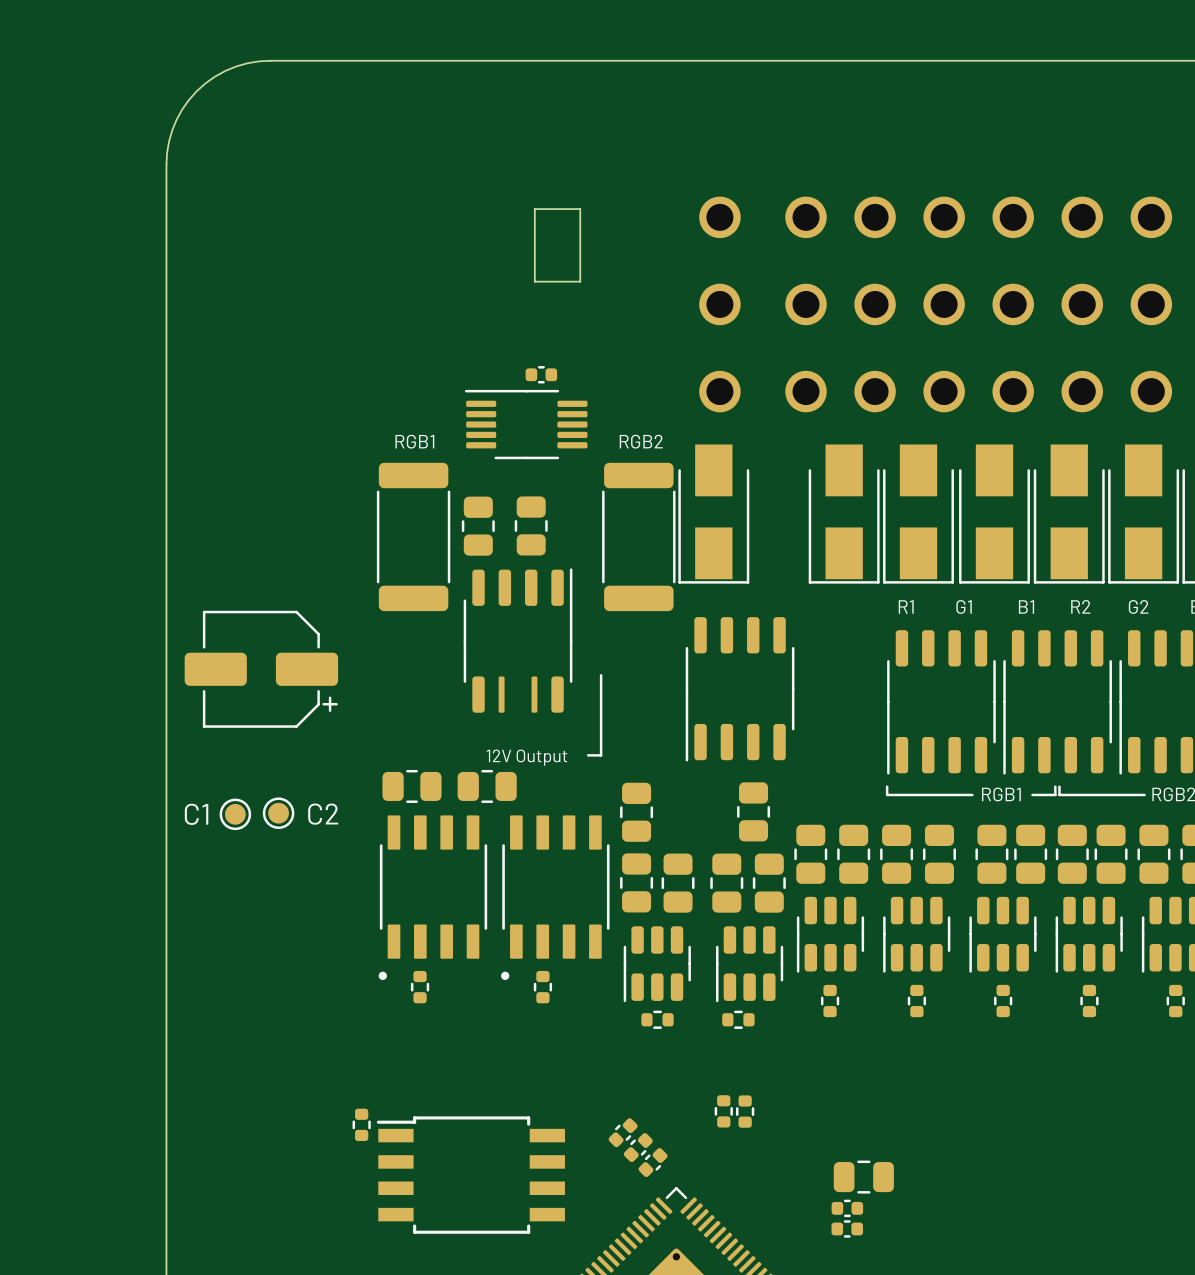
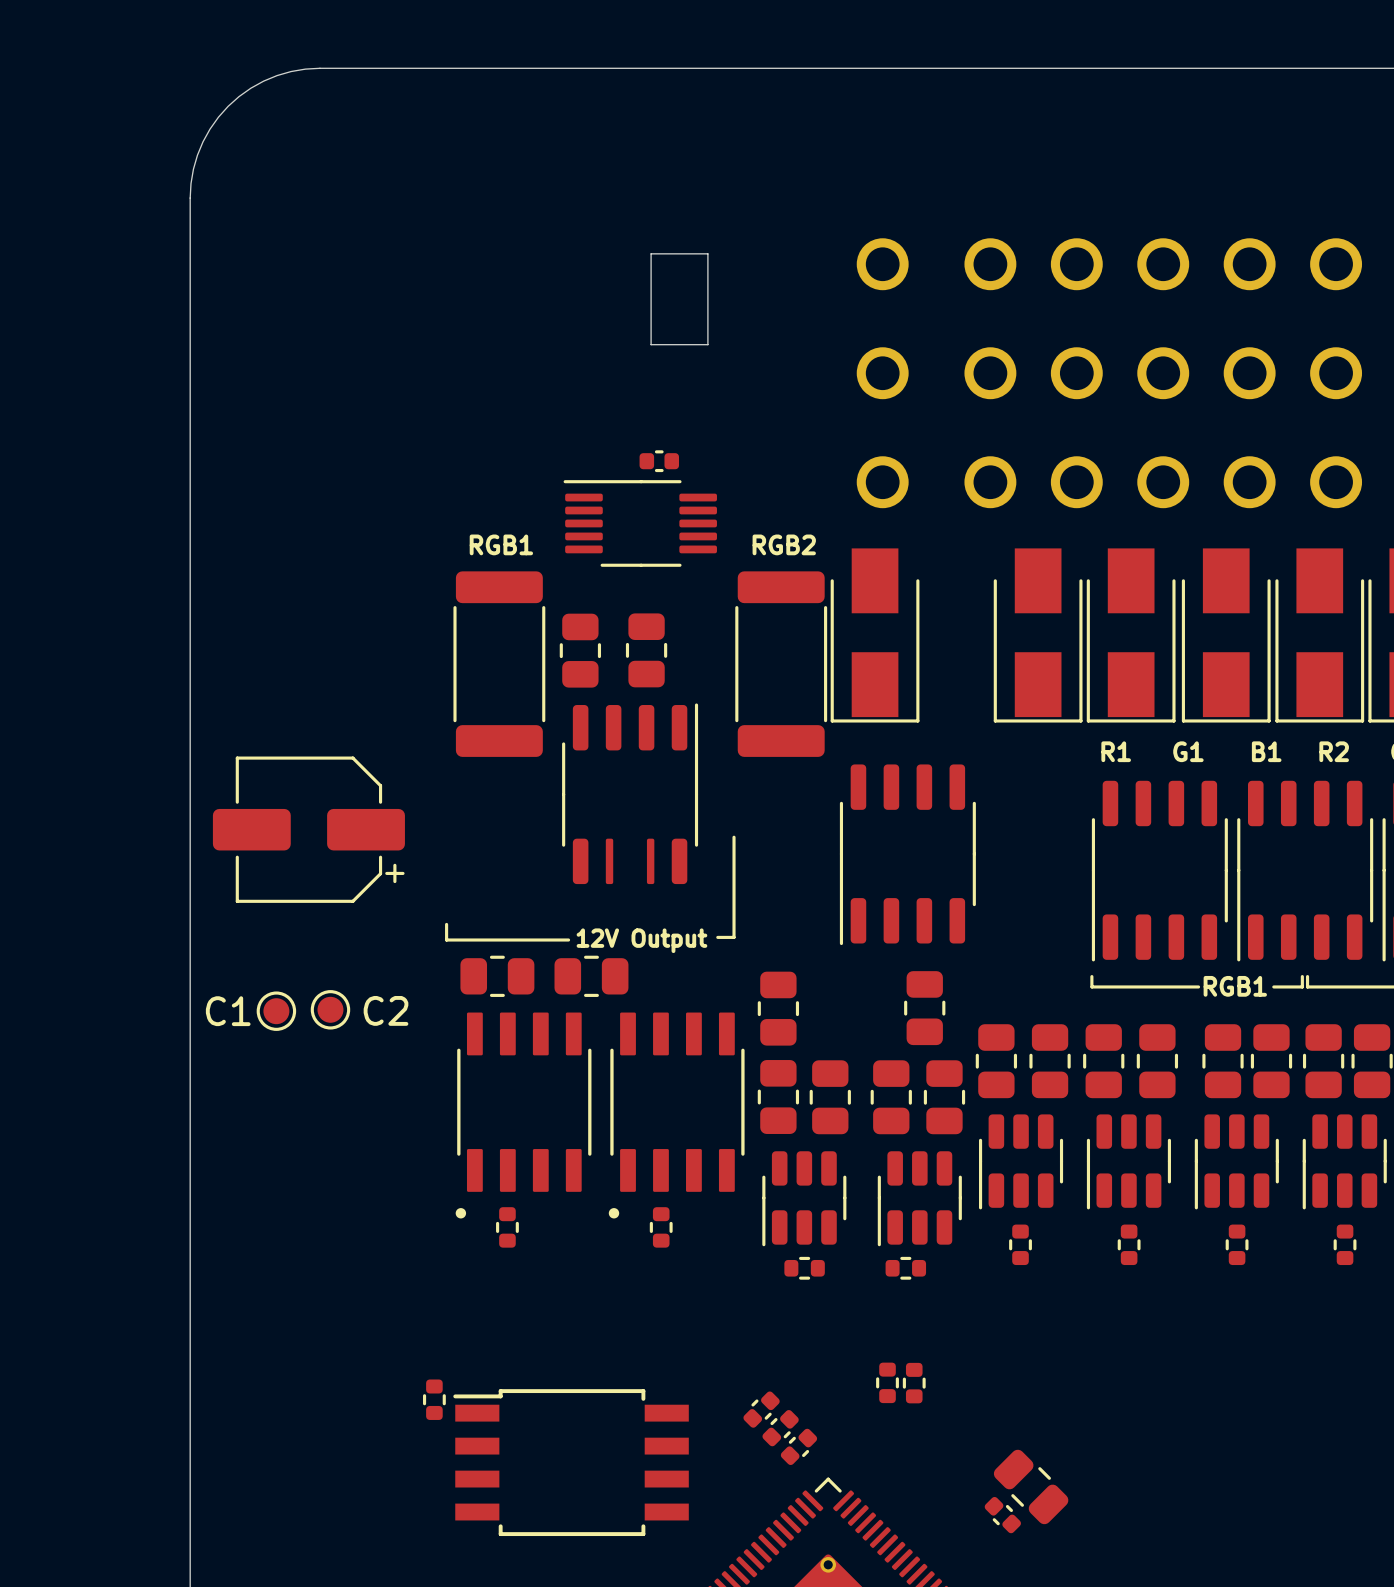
line: none -> (446, 924) (446, 940) (568, 940)
part: (863, 1177) -> none
part: none -> (1031, 1486)
part: (847, 1208) -> none
part: none -> (1002, 1515)
part: (847, 1228) -> none

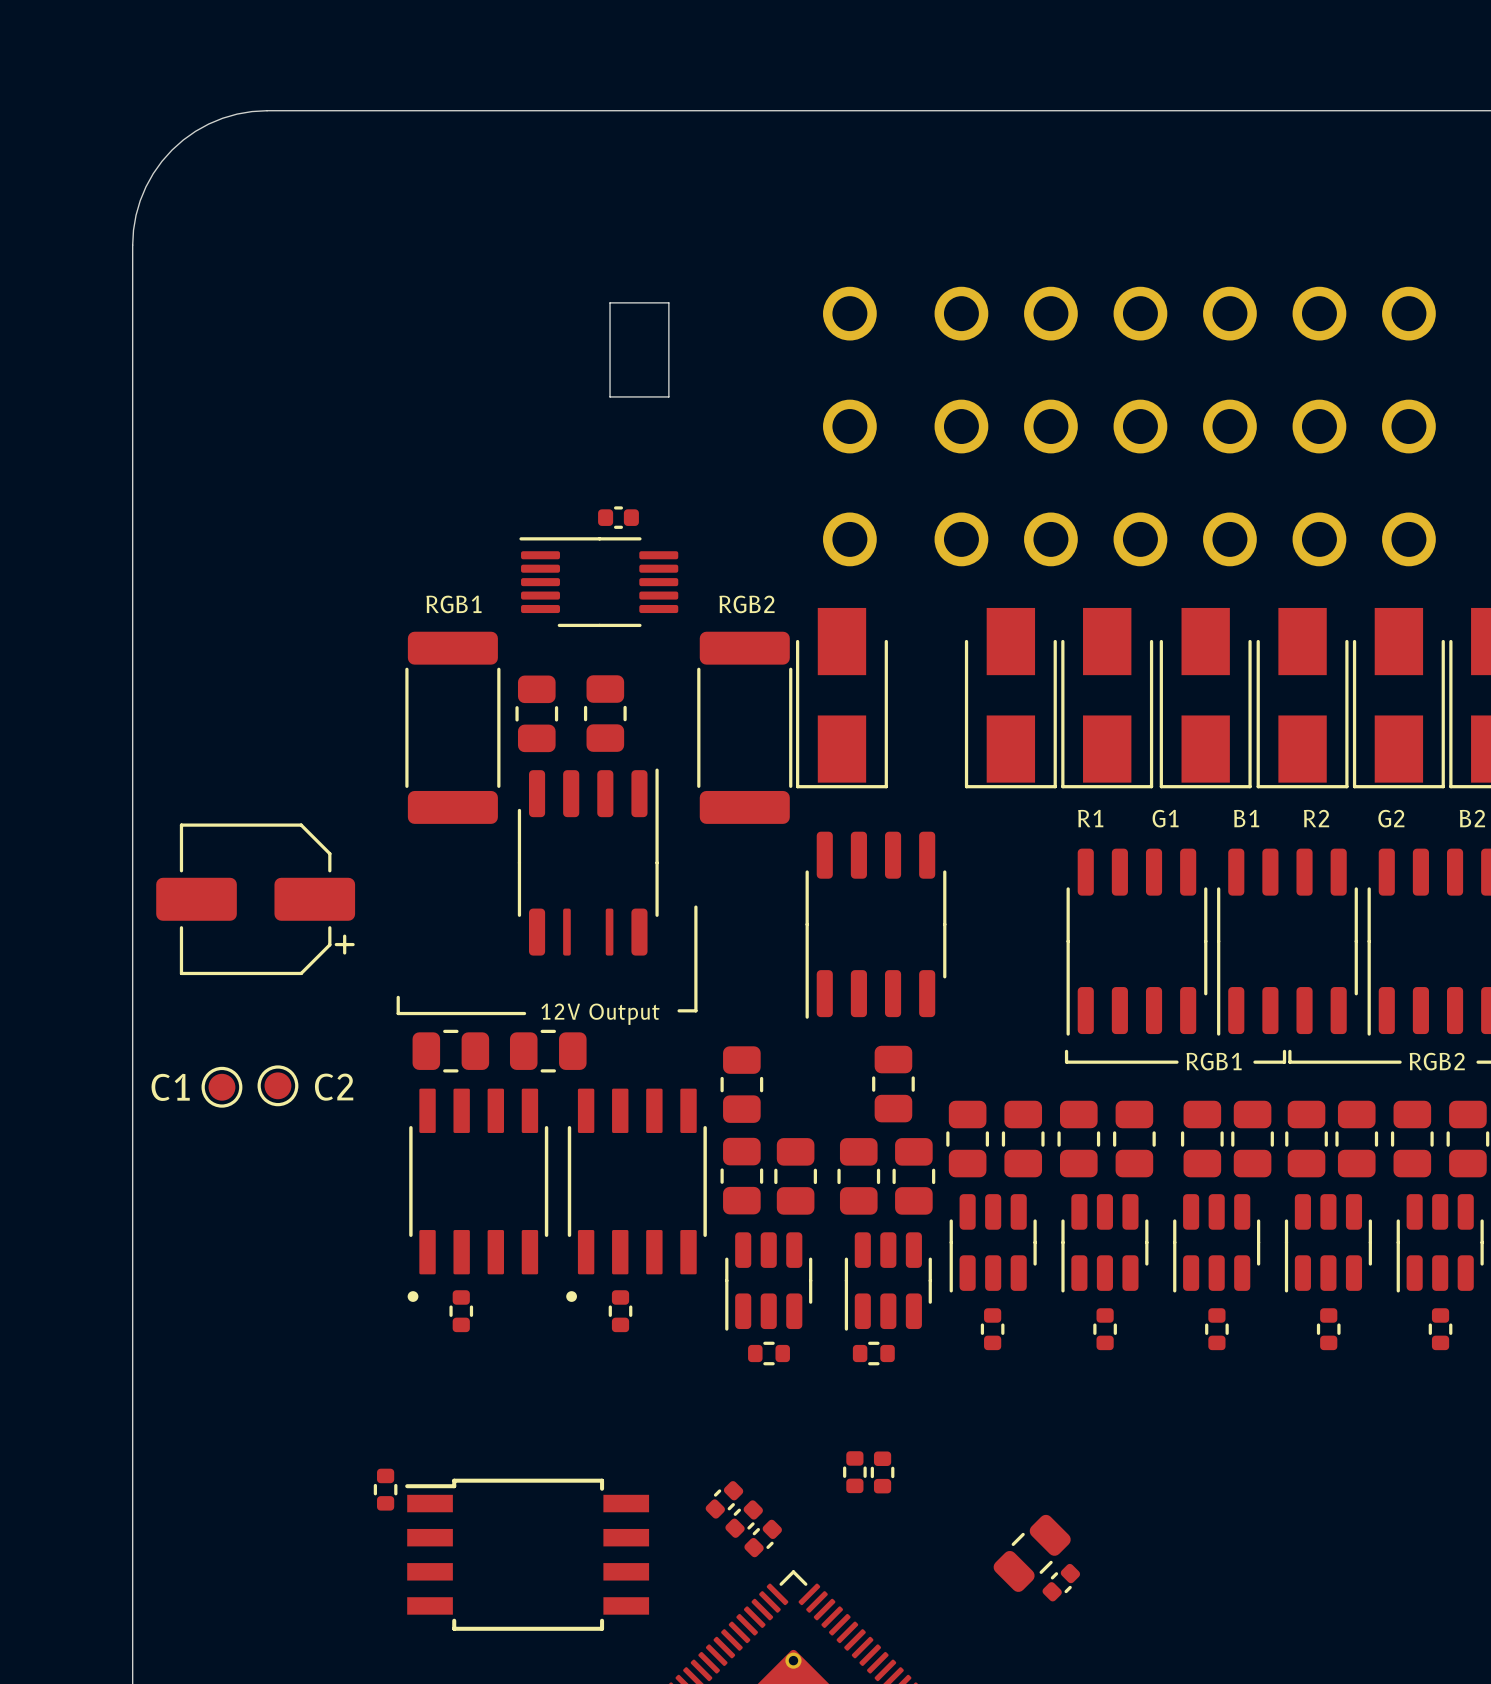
part rotation: 0° (1031, 1486) -> 90° clockwise (1032, 1553)
part rotation: 0° (1002, 1515) -> 90° clockwise (1061, 1582)
part position: (1002, 1515) -> (1061, 1582)

